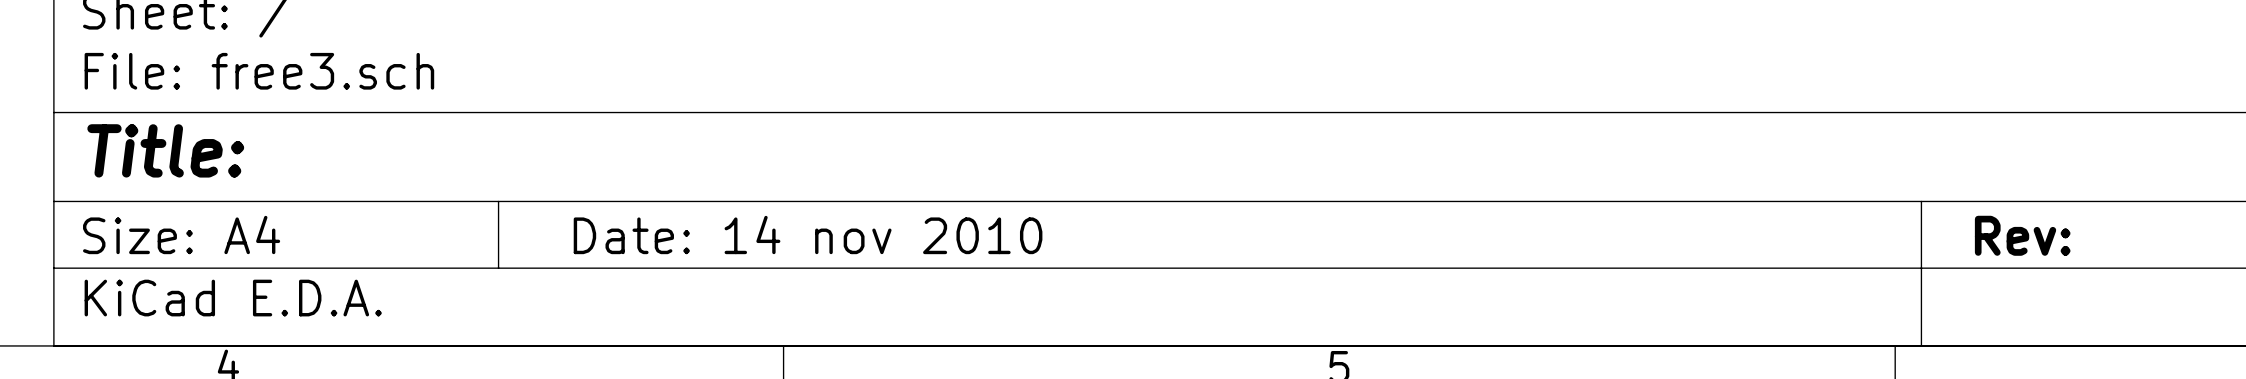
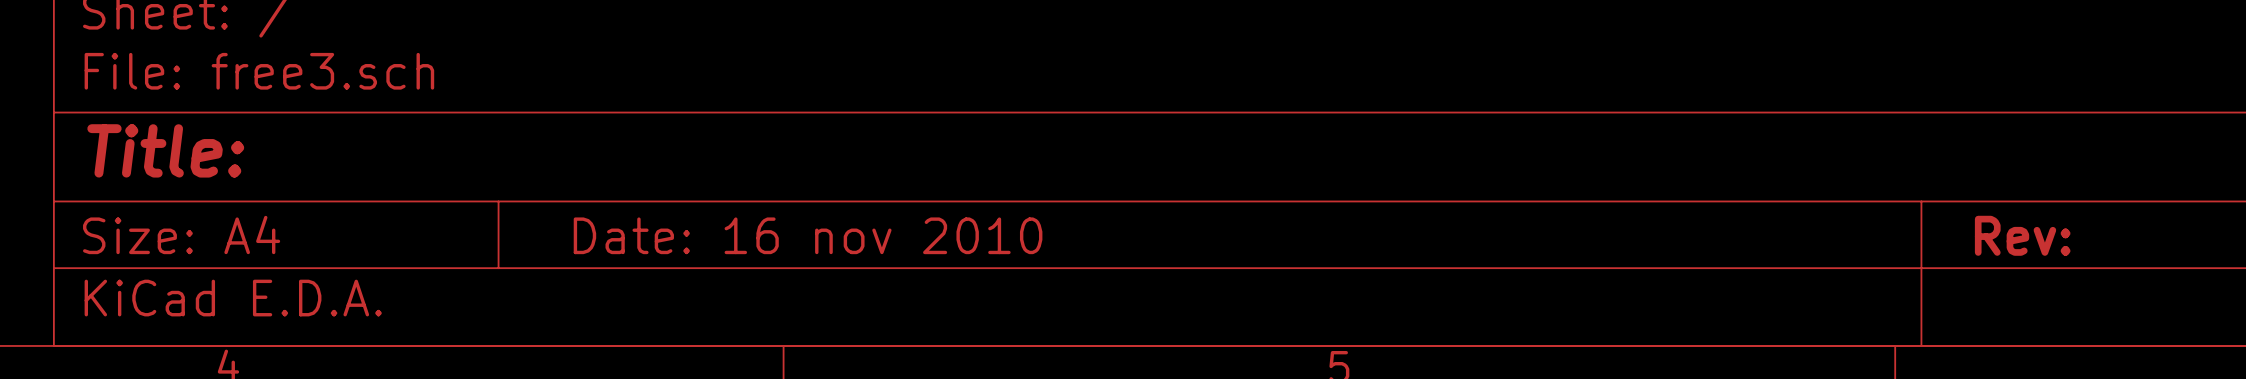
title block: Date: 14 nov 2010 (808, 234) -> Date: 16 nov 2010 (808, 235)

